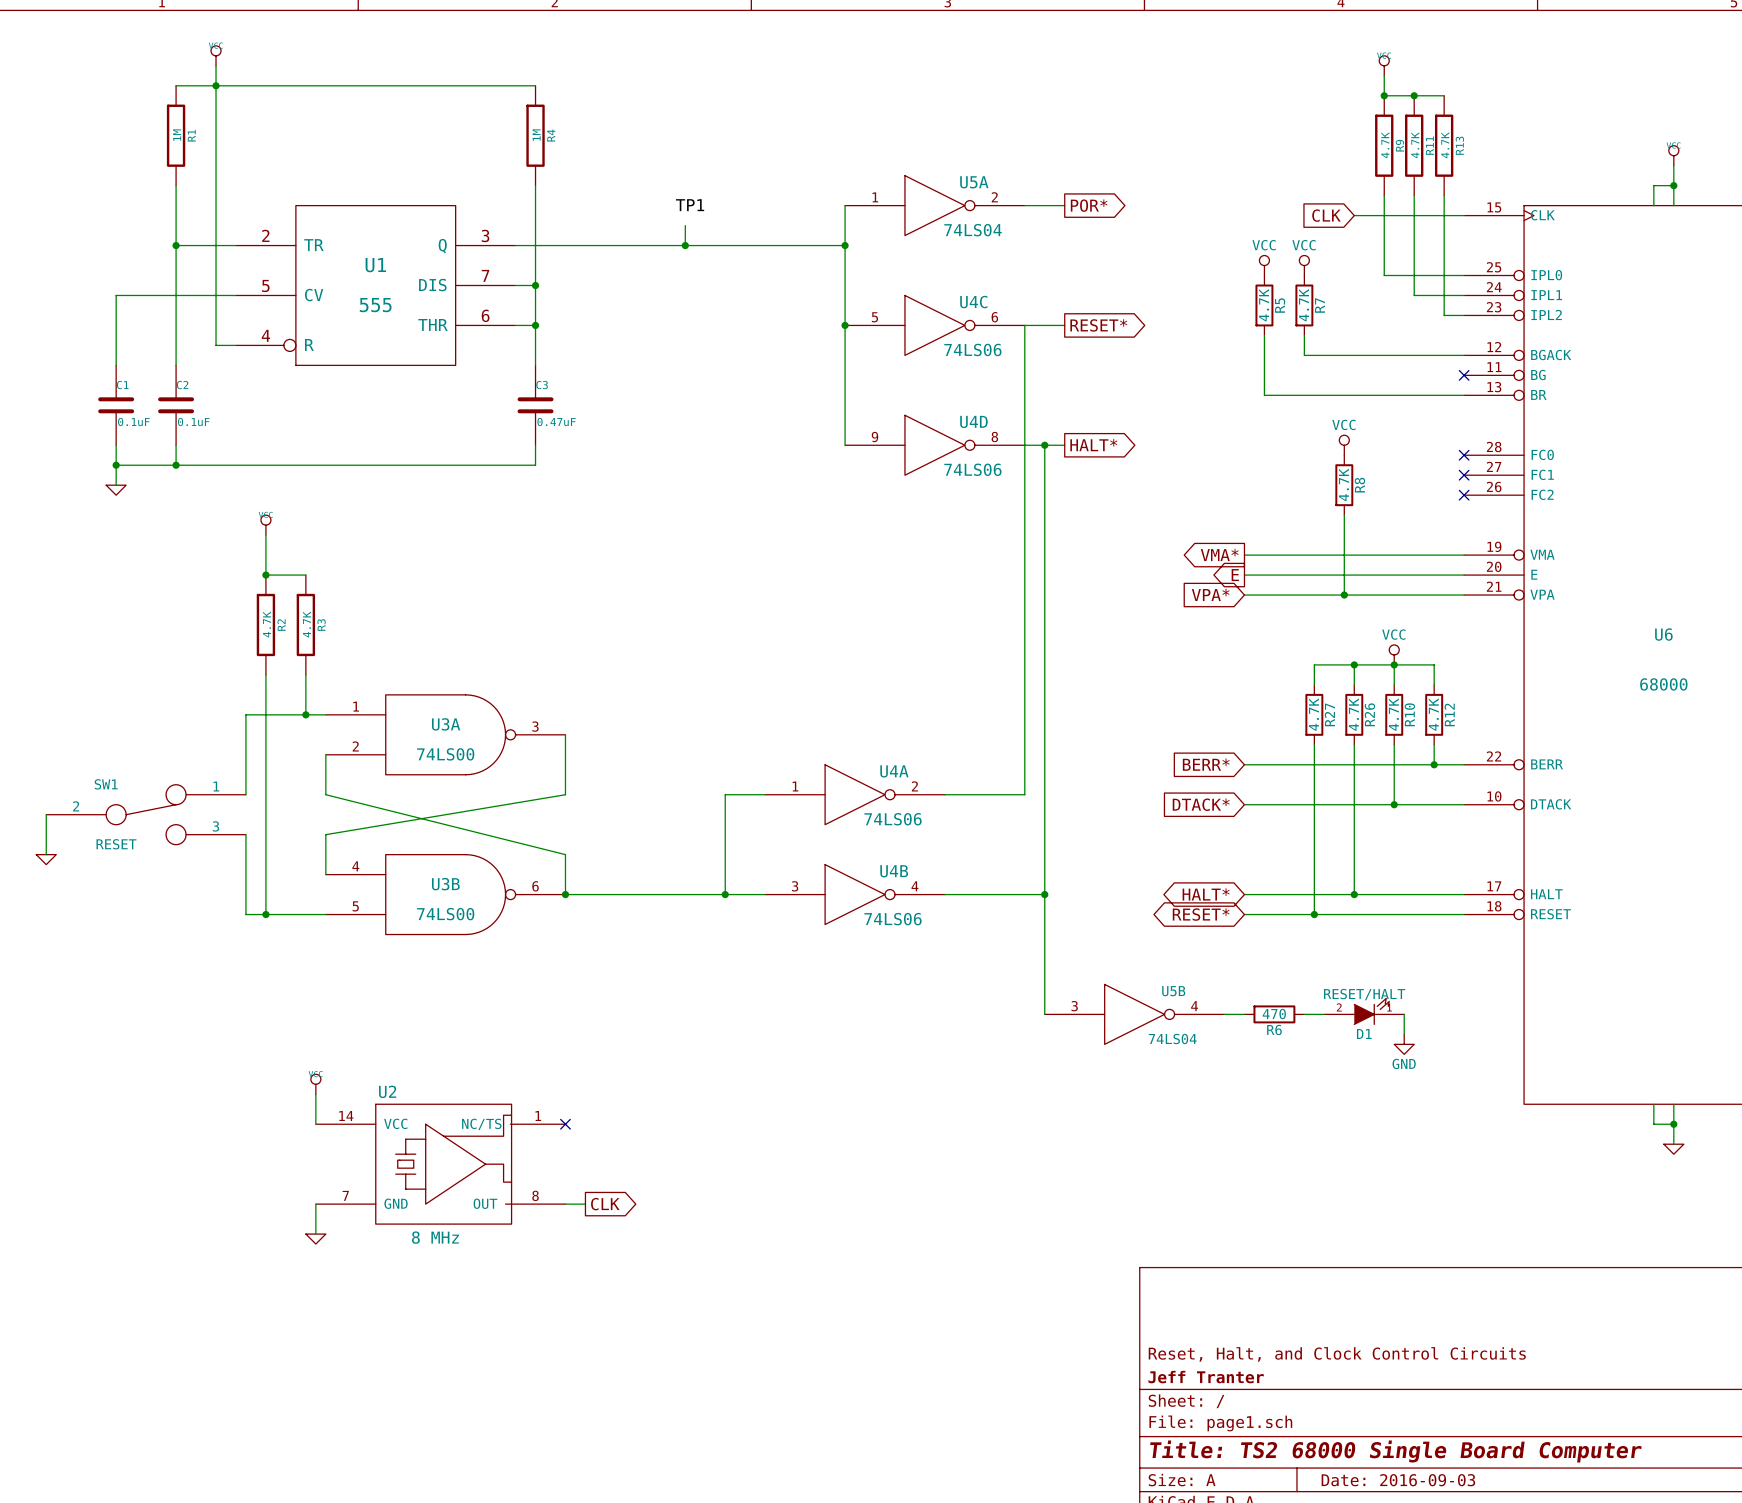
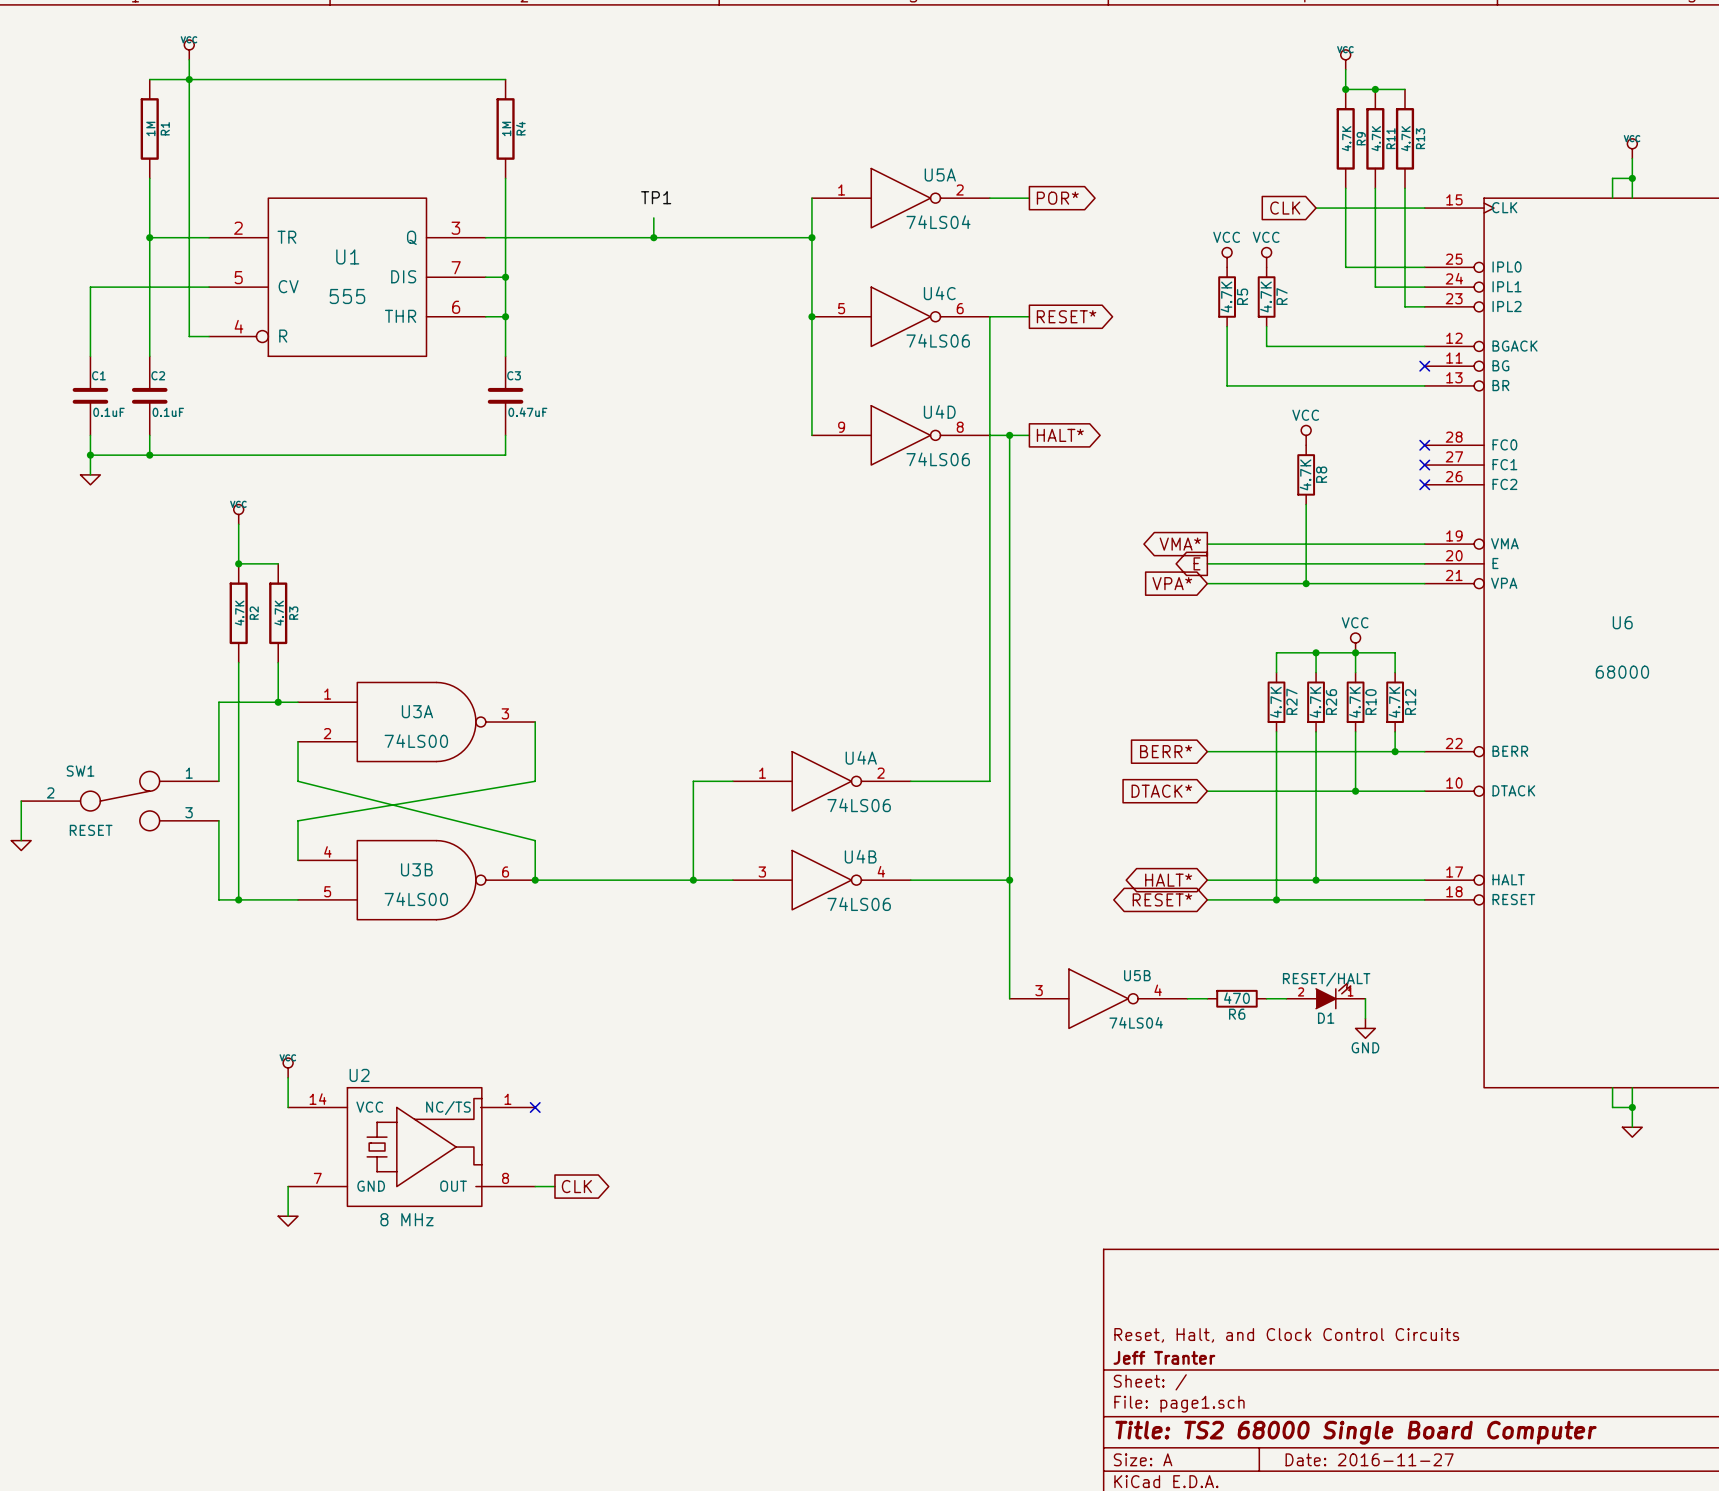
title block: Date: 2016-09-03 (1398, 1480) -> Date: 2016-11-27 (1369, 1459)

